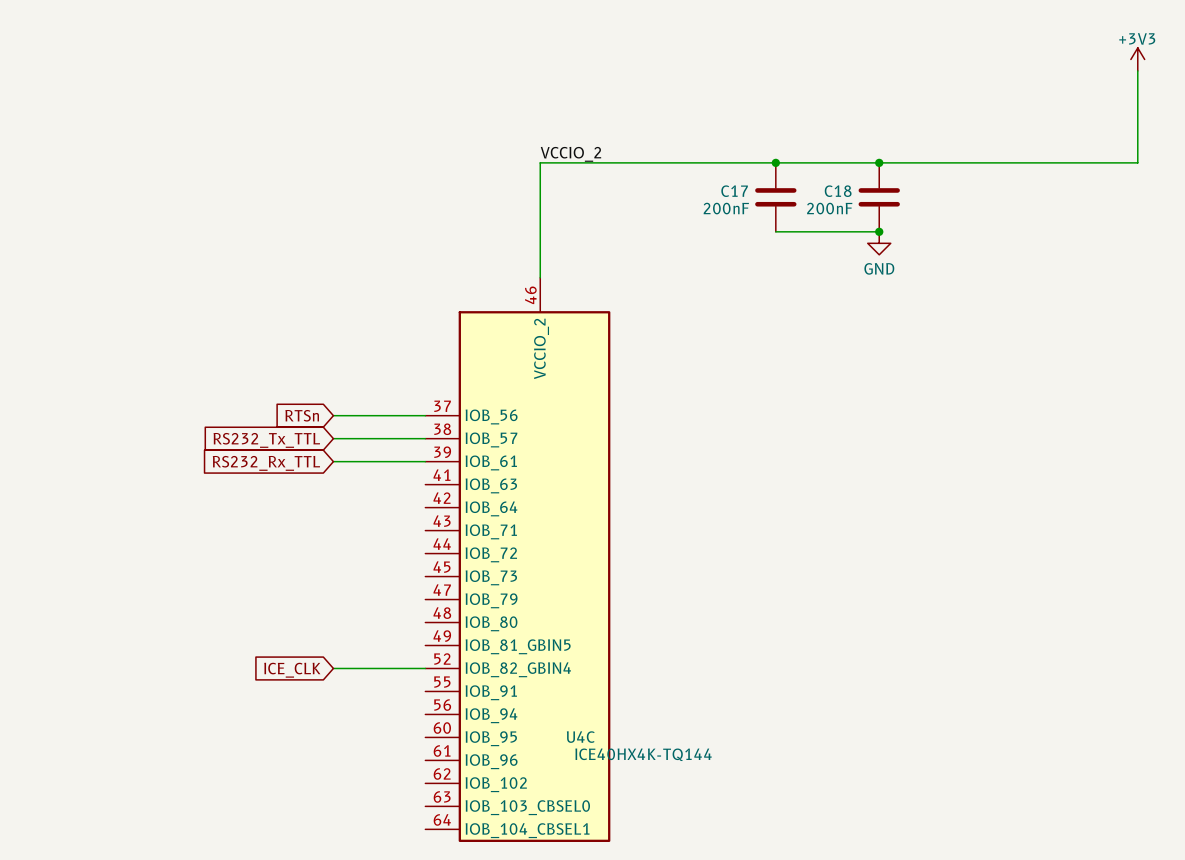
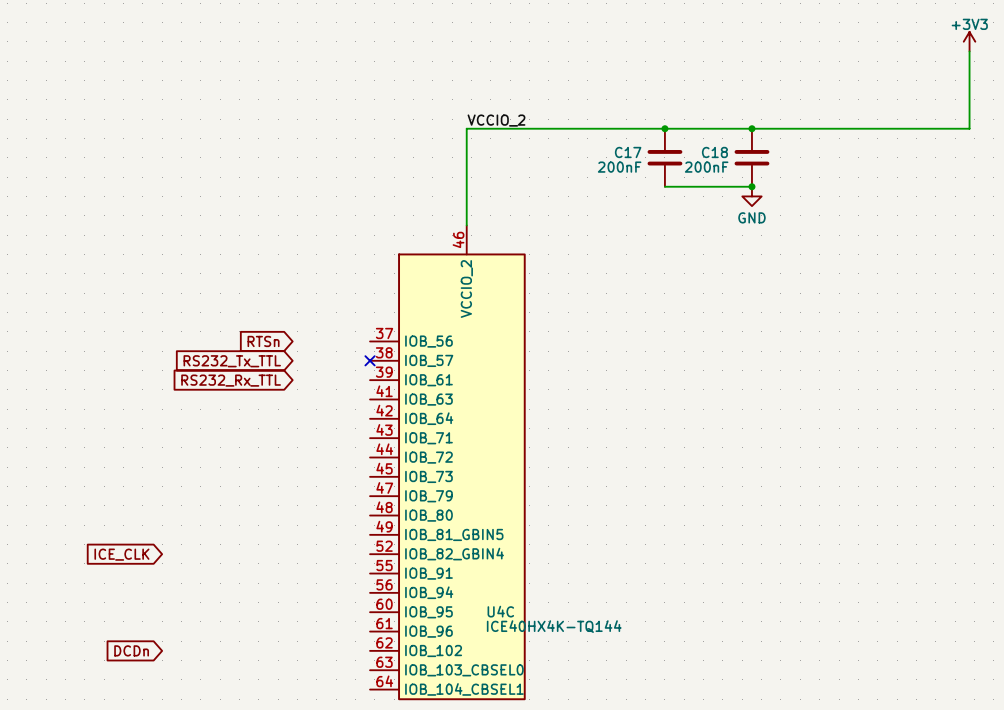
wire: (333, 415) (425, 415) -> none
wire: (333, 438) (425, 438) -> none
no-connect mark: none -> (370, 360)
wire: (333, 461) (425, 461) -> none
wire: (333, 668) (425, 668) -> none
global label position: ICE_CLK (292, 670) -> ICE_CLK (121, 554)
global label: none -> DCDn (131, 650)

